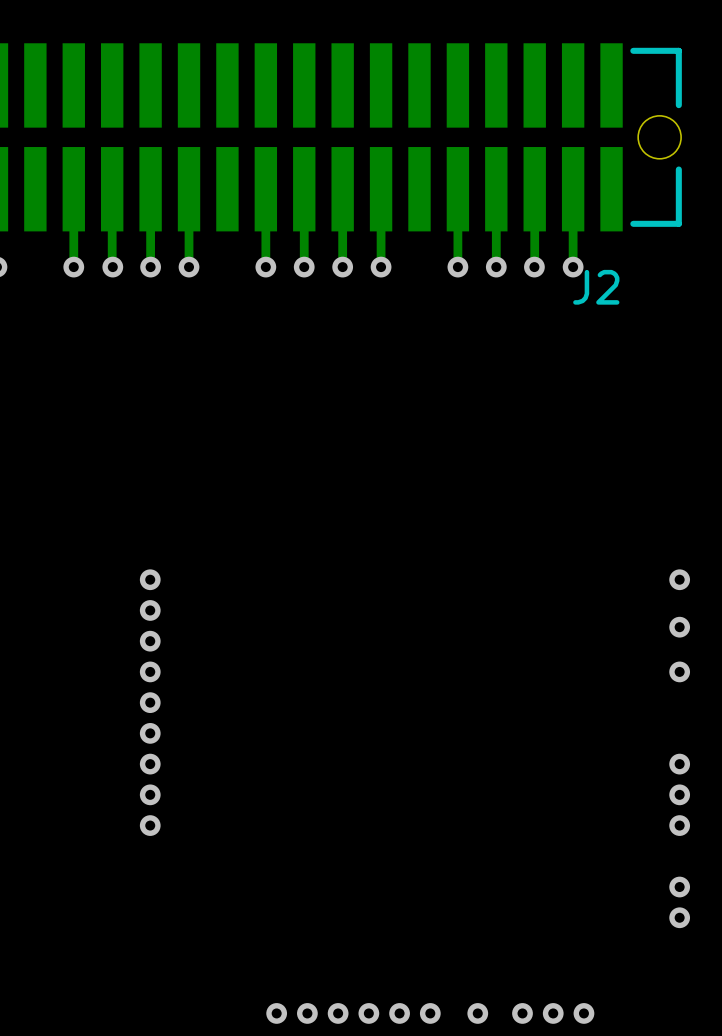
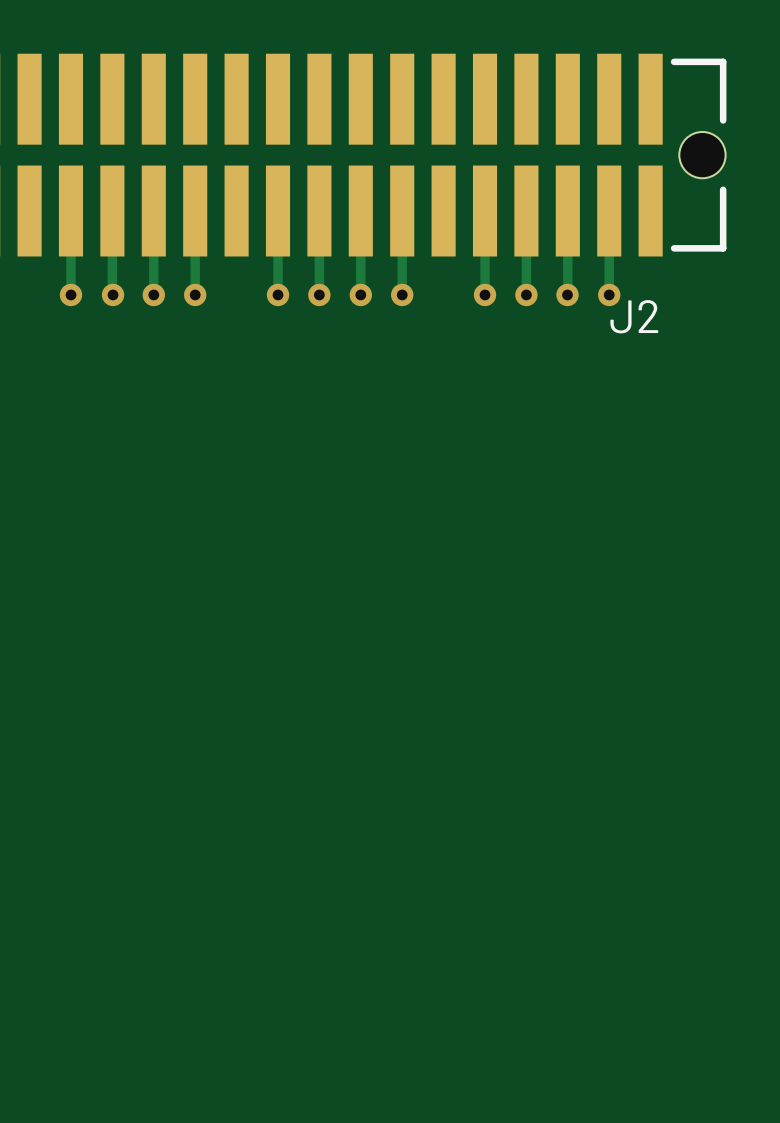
via: (150, 579) -> none
via: (679, 579) -> none
via: (150, 610) -> none
via: (679, 627) -> none
via: (150, 641) -> none
via: (150, 671) -> none
via: (679, 671) -> none
via: (150, 702) -> none
via: (150, 733) -> none
via: (150, 764) -> none
via: (679, 764) -> none
via: (150, 794) -> none
via: (679, 794) -> none
via: (150, 825) -> none
via: (679, 825) -> none
via: (679, 887) -> none
via: (679, 917) -> none
via: (276, 1013) -> none
via: (307, 1013) -> none
via: (338, 1013) -> none
via: (368, 1013) -> none
via: (399, 1013) -> none
via: (430, 1013) -> none
via: (477, 1013) -> none
via: (522, 1013) -> none
via: (553, 1013) -> none
via: (583, 1013) -> none

